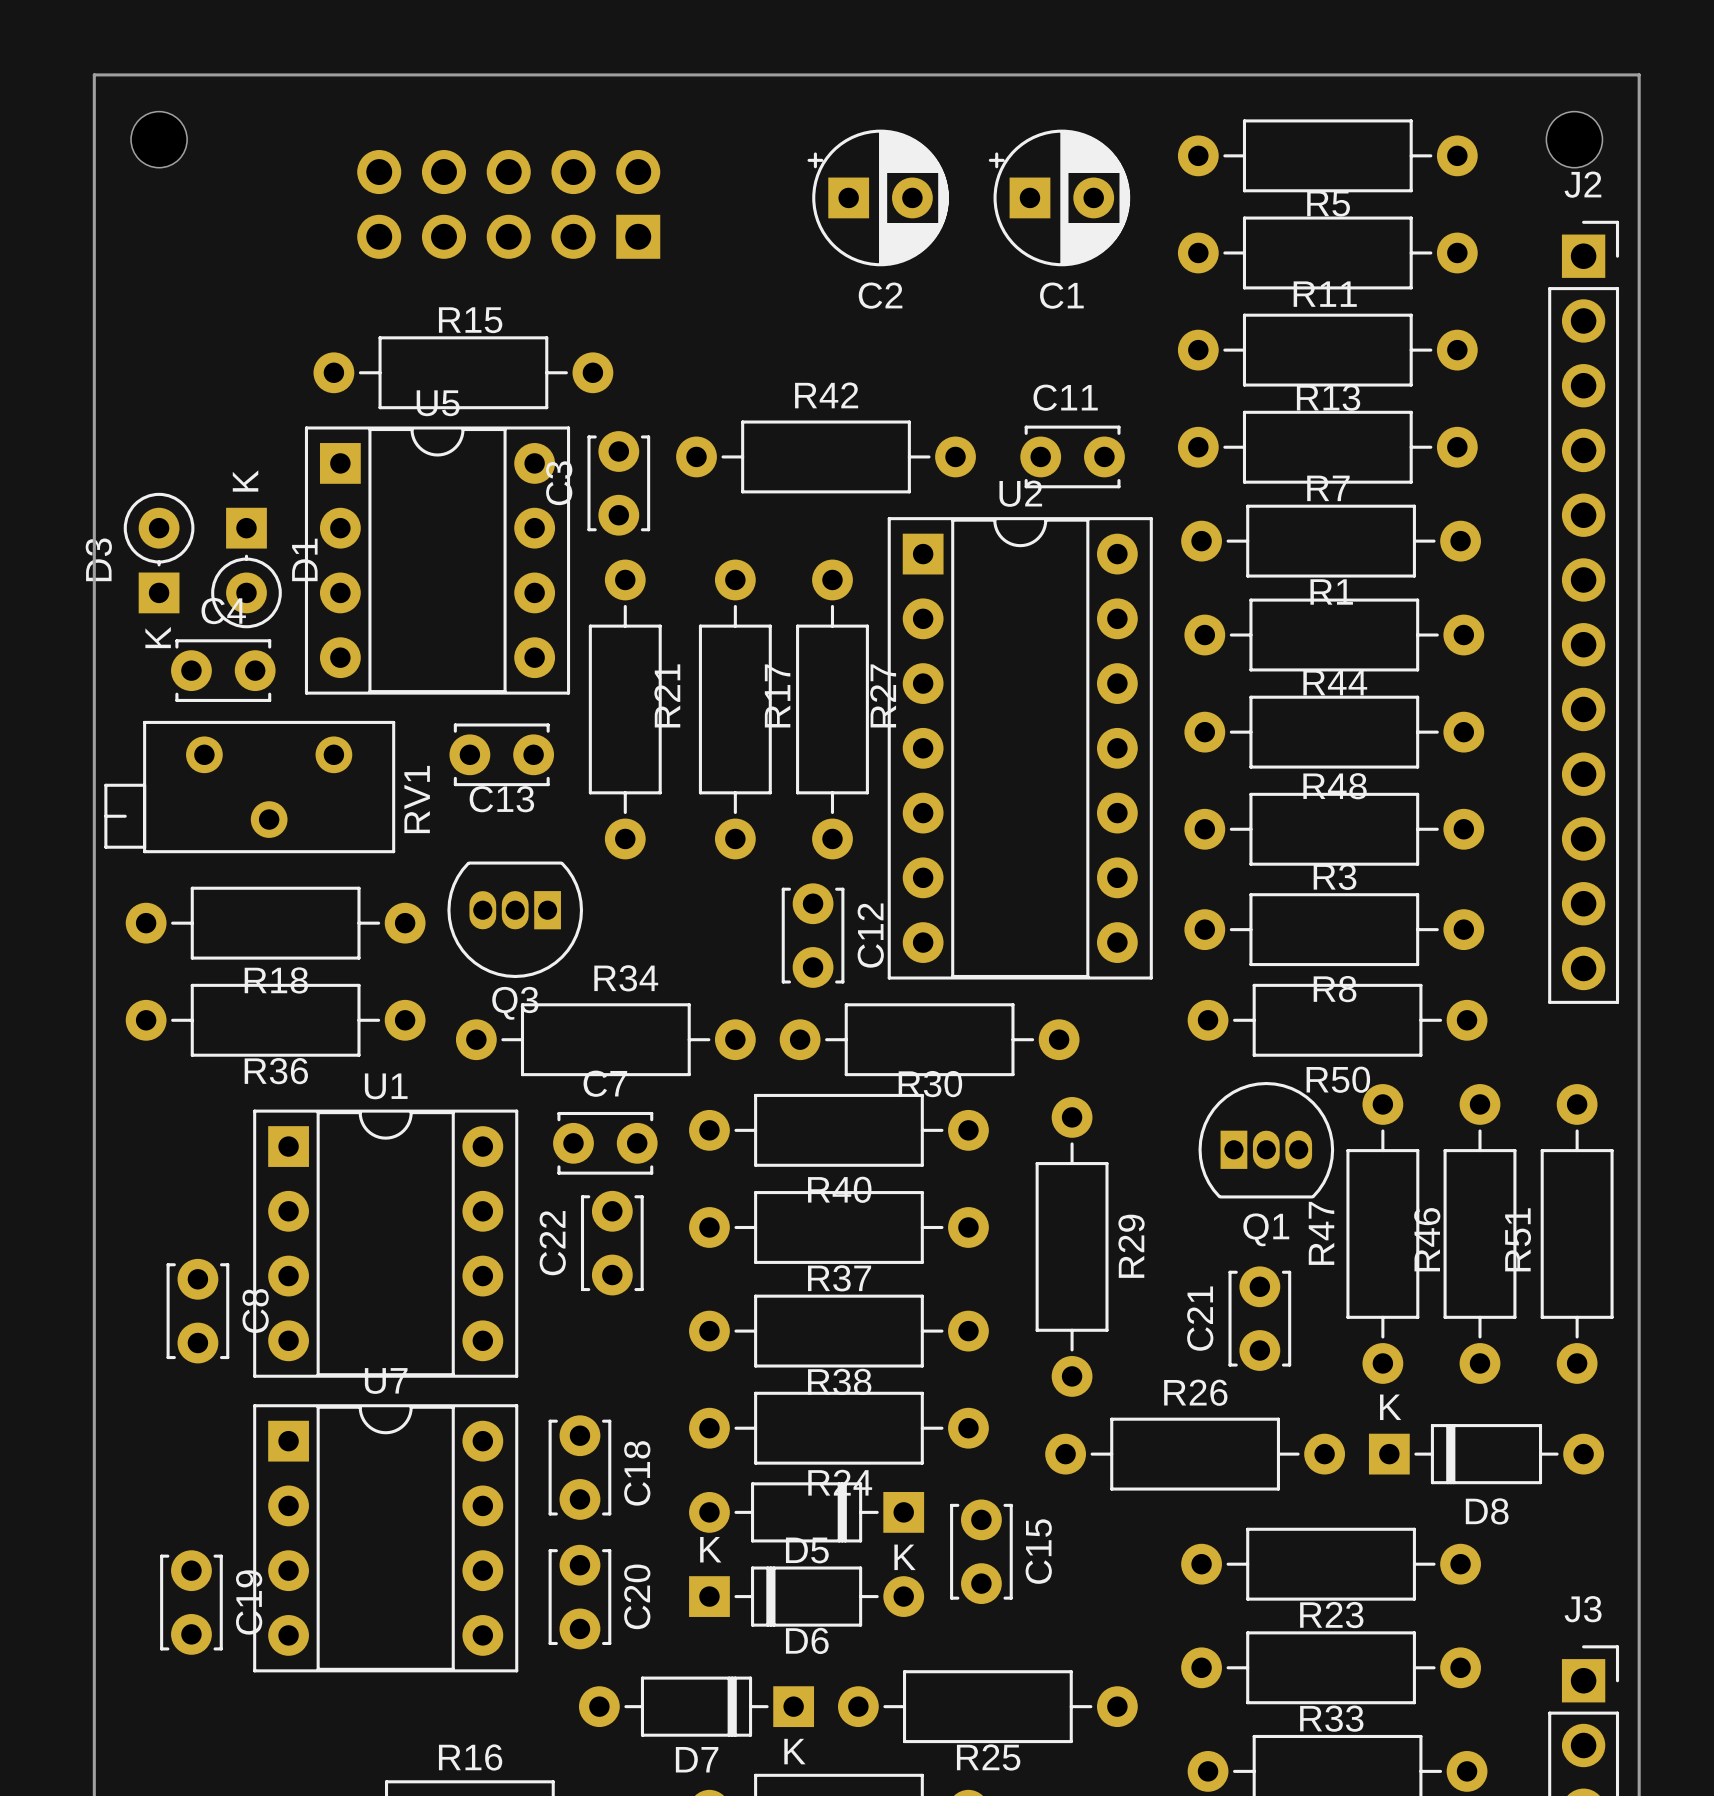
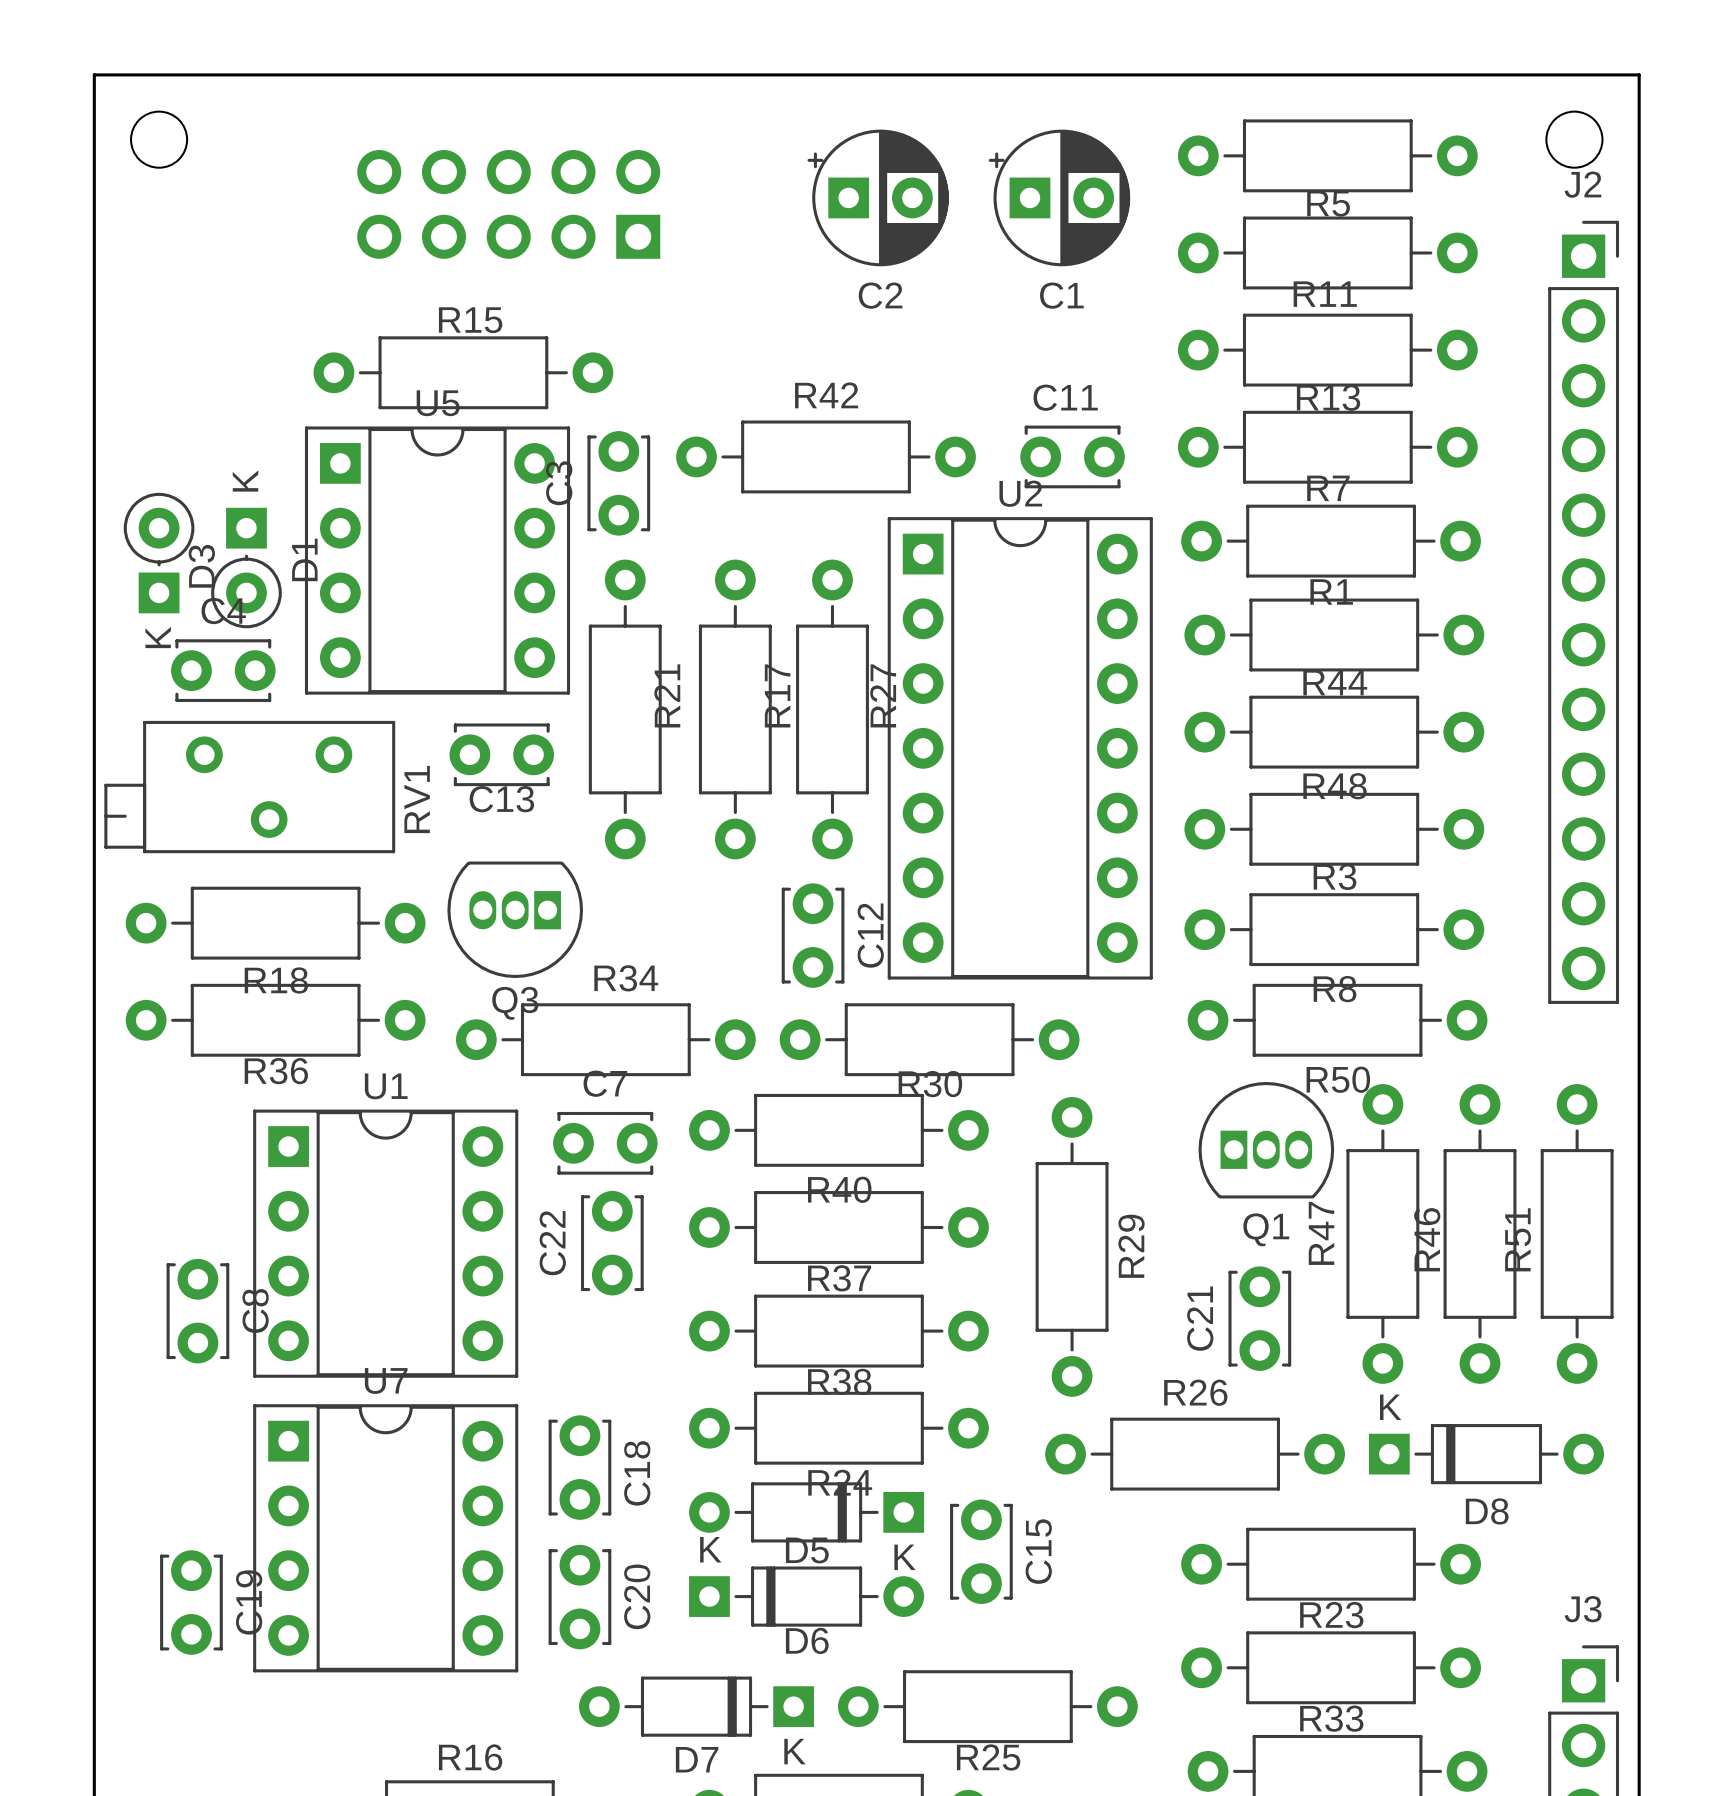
D3 name position: D3 (98, 559) -> D3 (201, 566)

